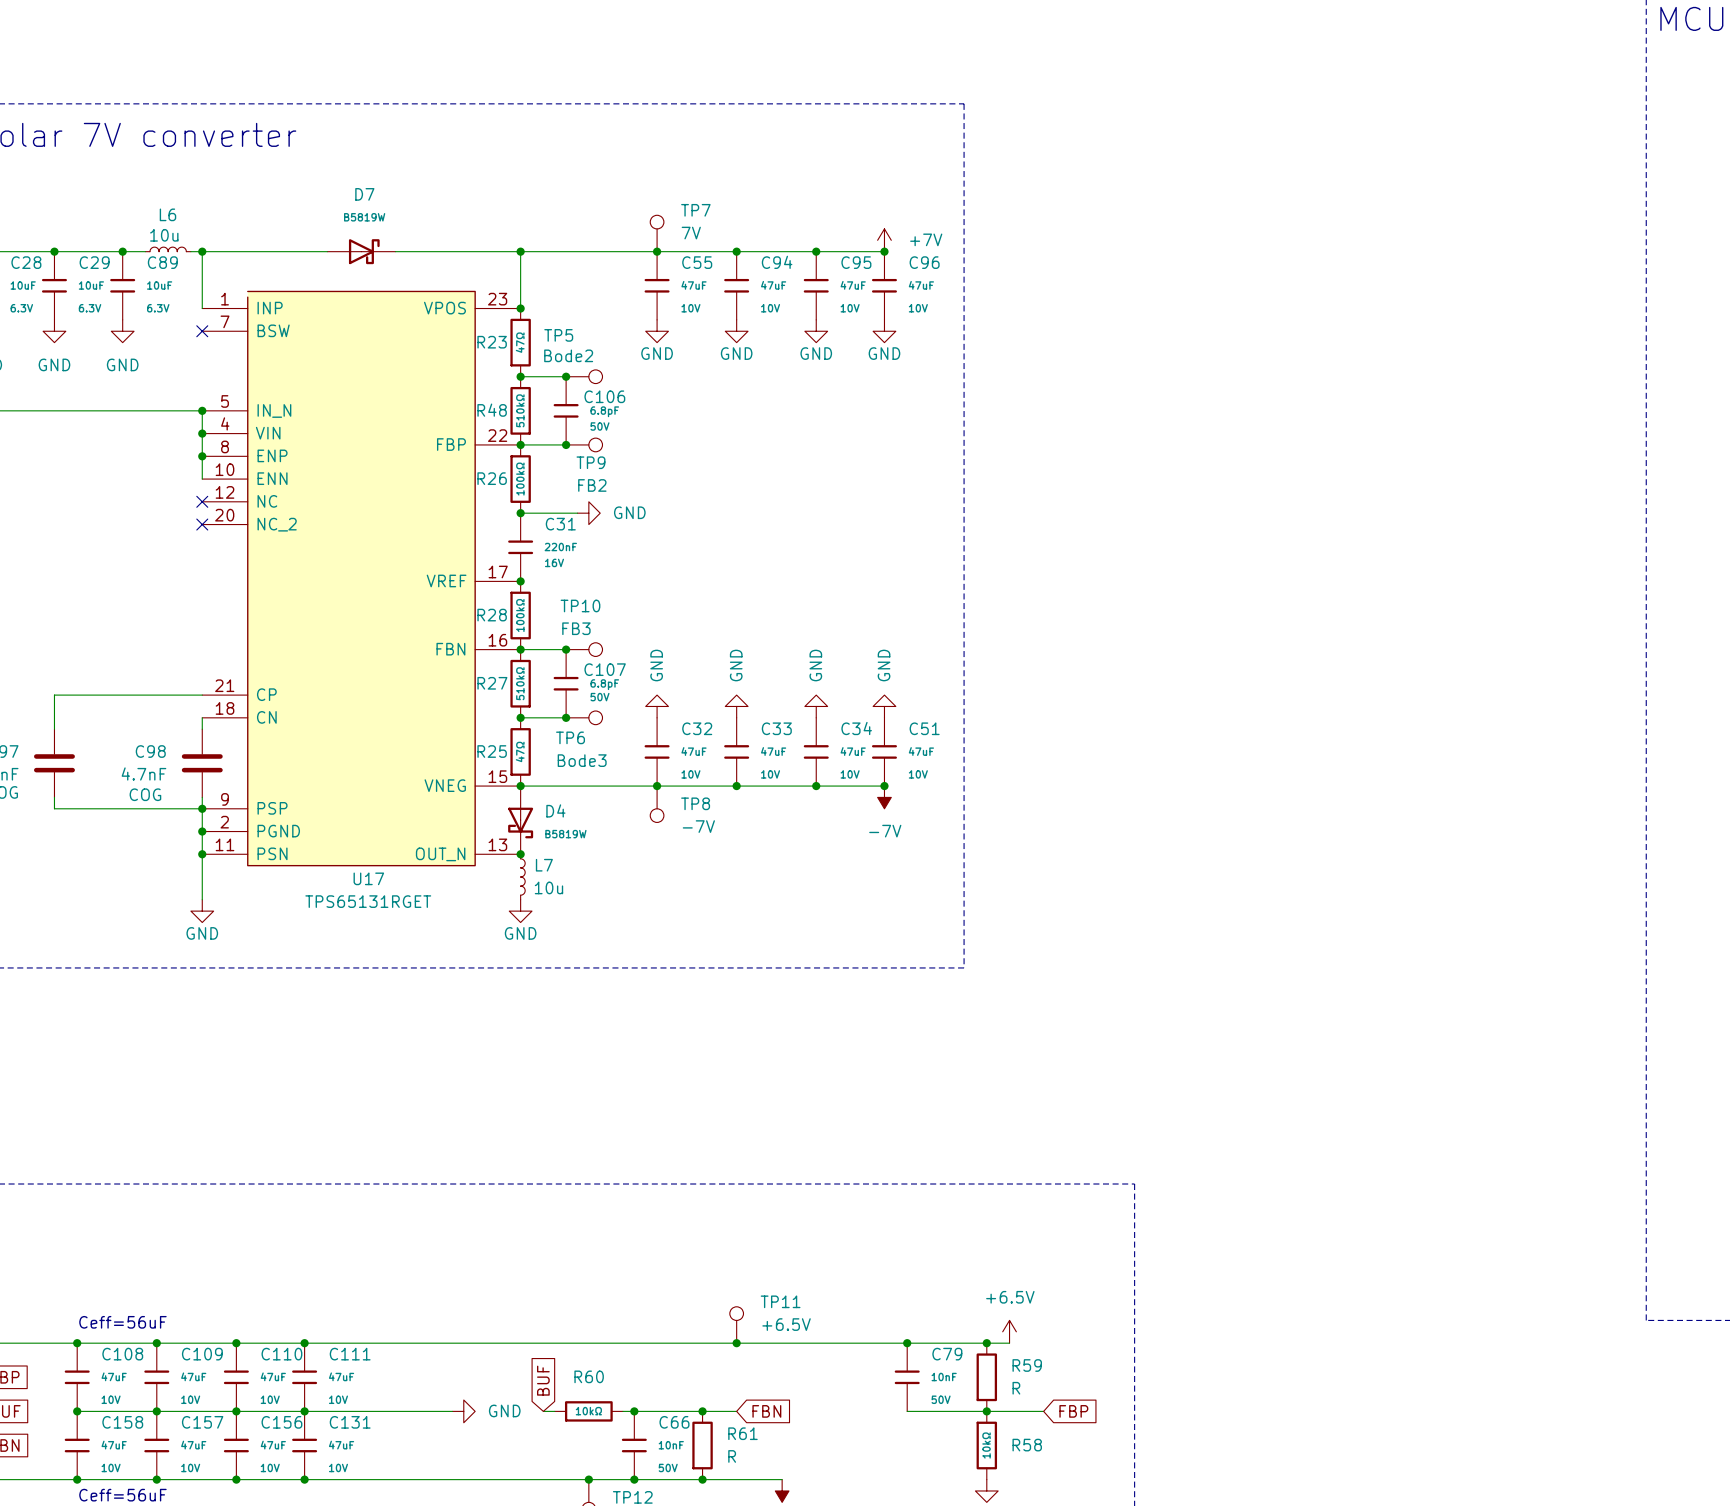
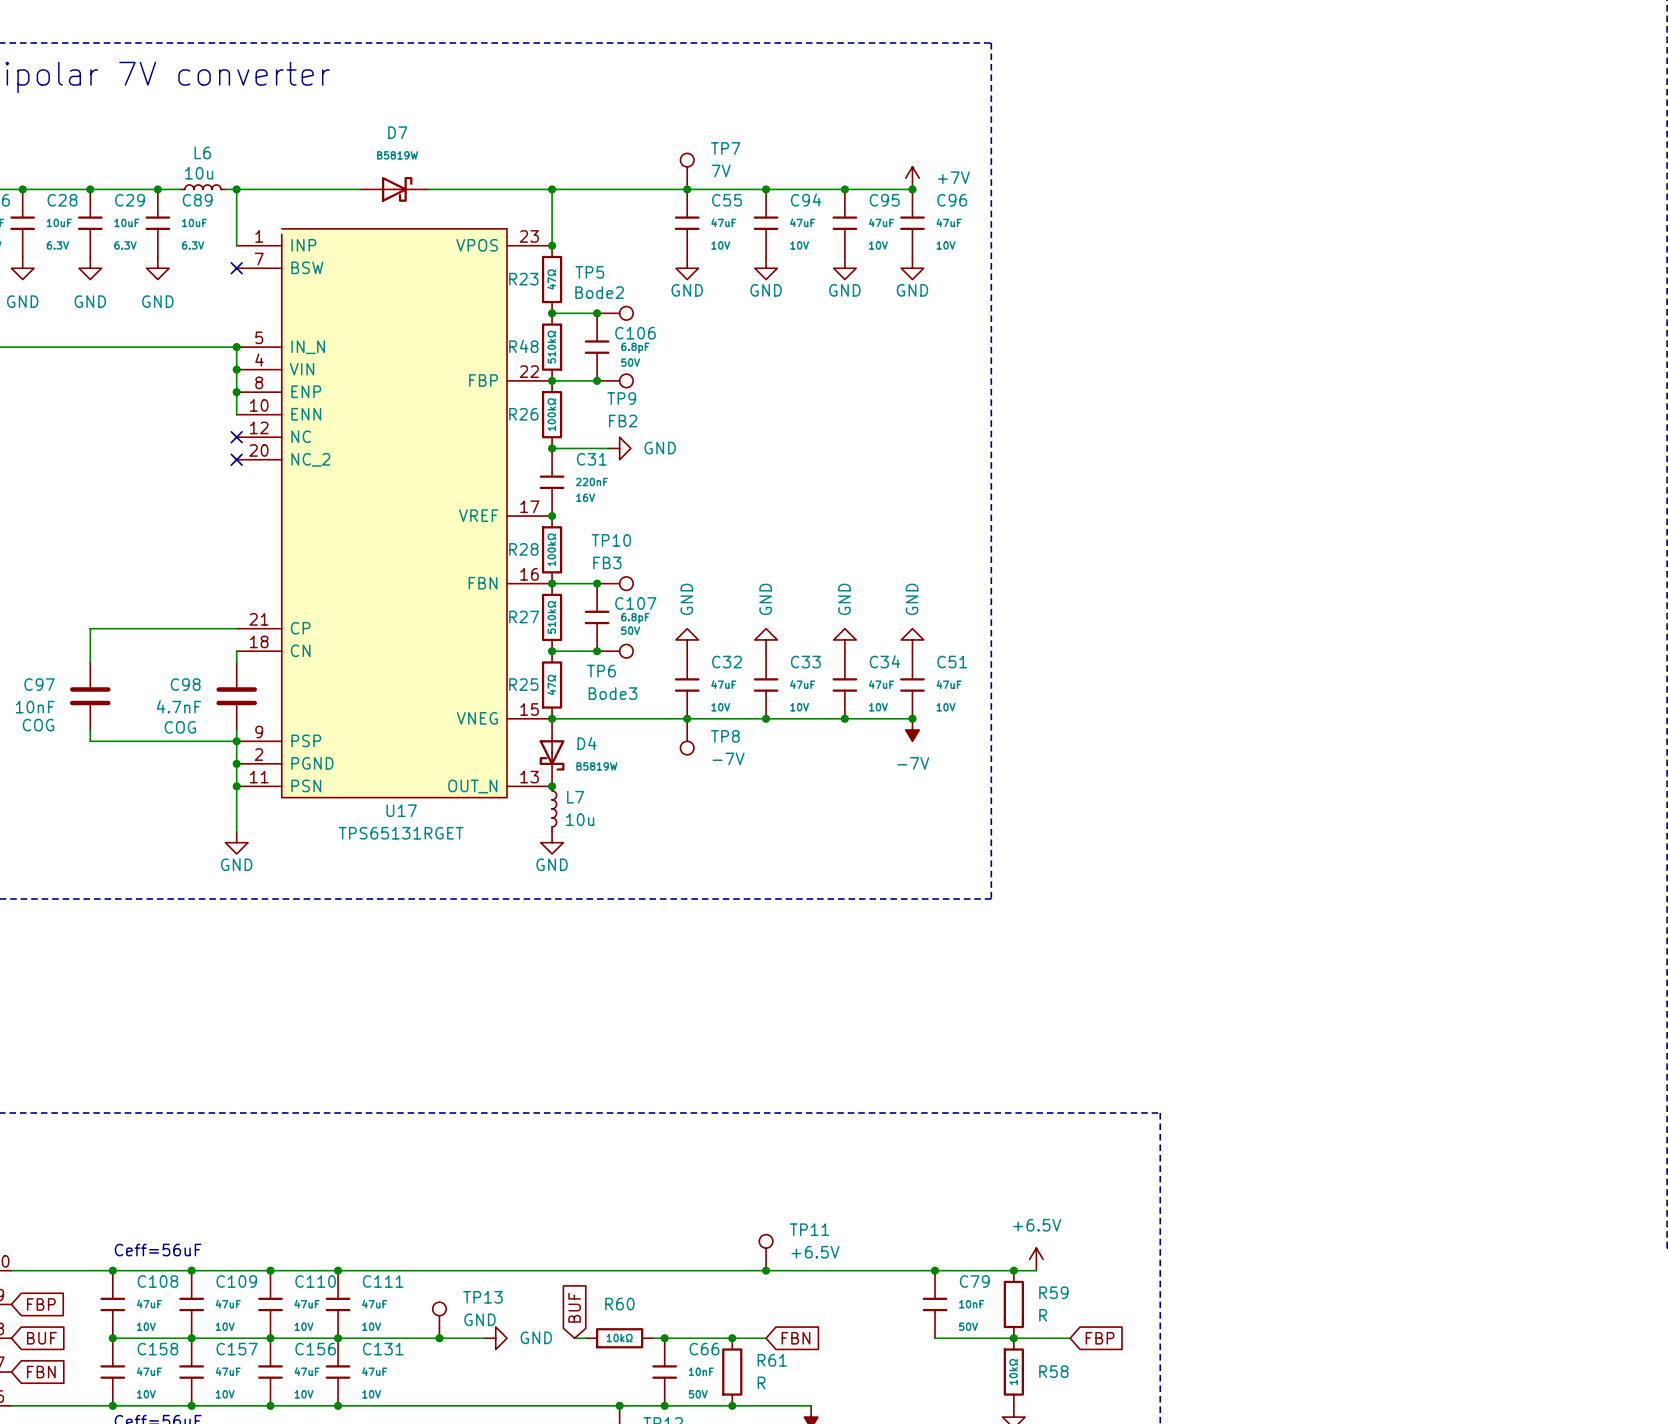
TP13: none -> GND (439, 1320)
junction: none -> (439, 1338)

